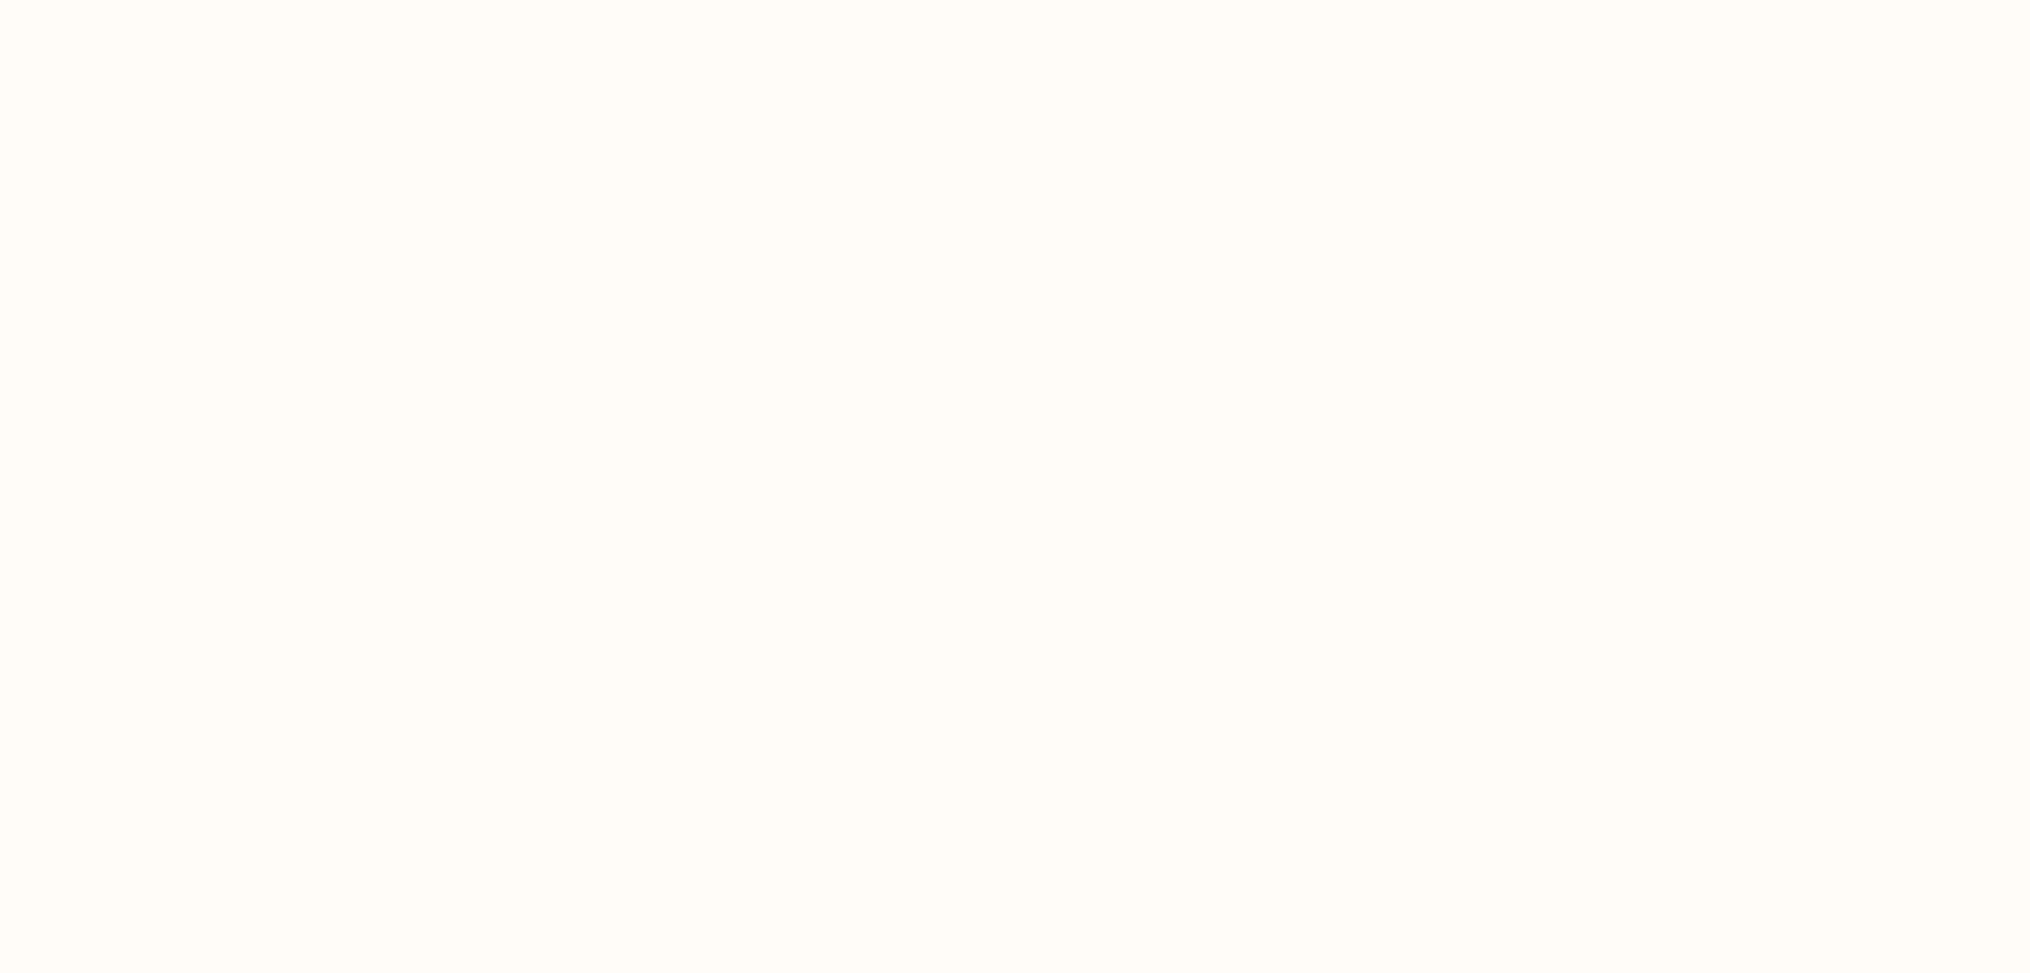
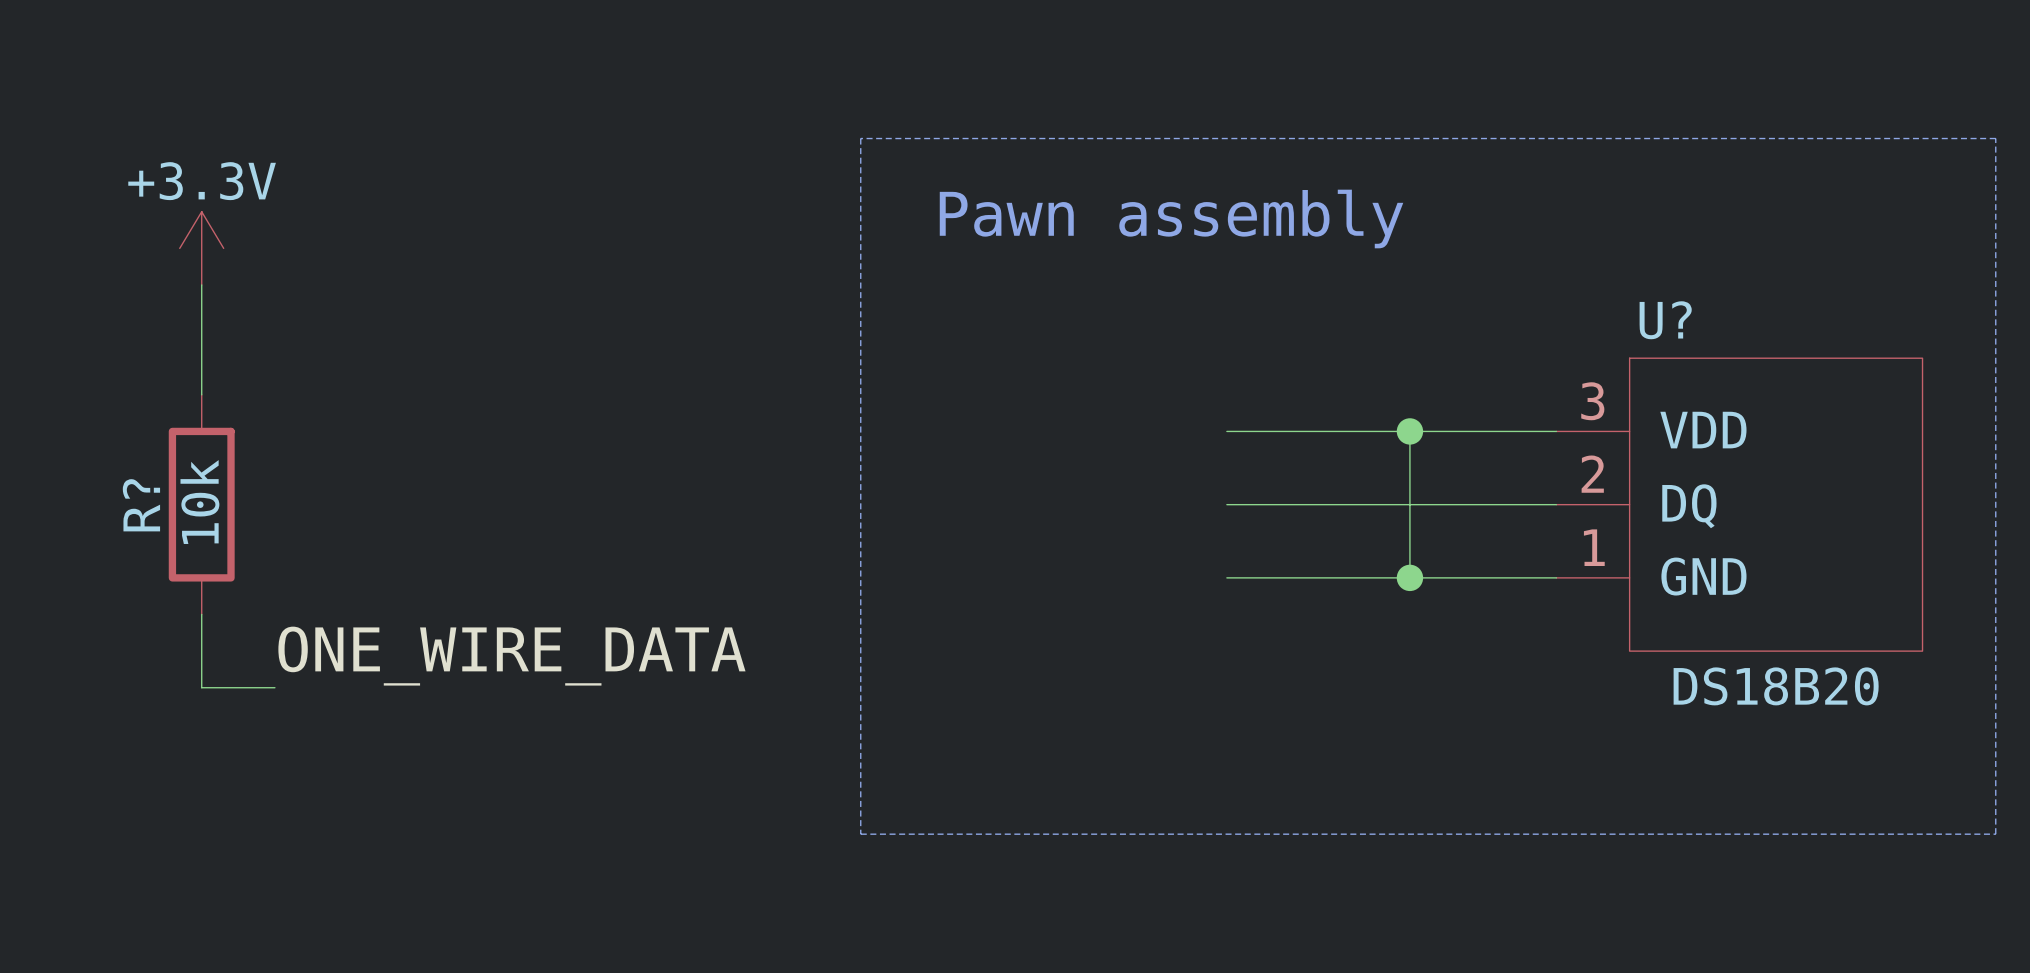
line: none -> (860, 138) (1995, 138) (1995, 834) (860, 834) (860, 138)
text: none -> Pawn assembly (1171, 219)
power symbol: none -> +3.3V (201, 248)
wire: none -> (201, 284) (201, 394)
wire: none -> (1226, 431) (1556, 431)
wire: none -> (1409, 431) (1409, 577)
junction: none -> (1409, 431)
R?: none -> 10k (201, 504)
wire: none -> (1226, 504) (1556, 504)
U?: none -> DS18B20 (1739, 504)
wire: none -> (1226, 577) (1556, 577)
junction: none -> (1409, 577)
wire: none -> (201, 614) (201, 687) (274, 687)
label: none -> ONE_WIRE_DATA (511, 656)

